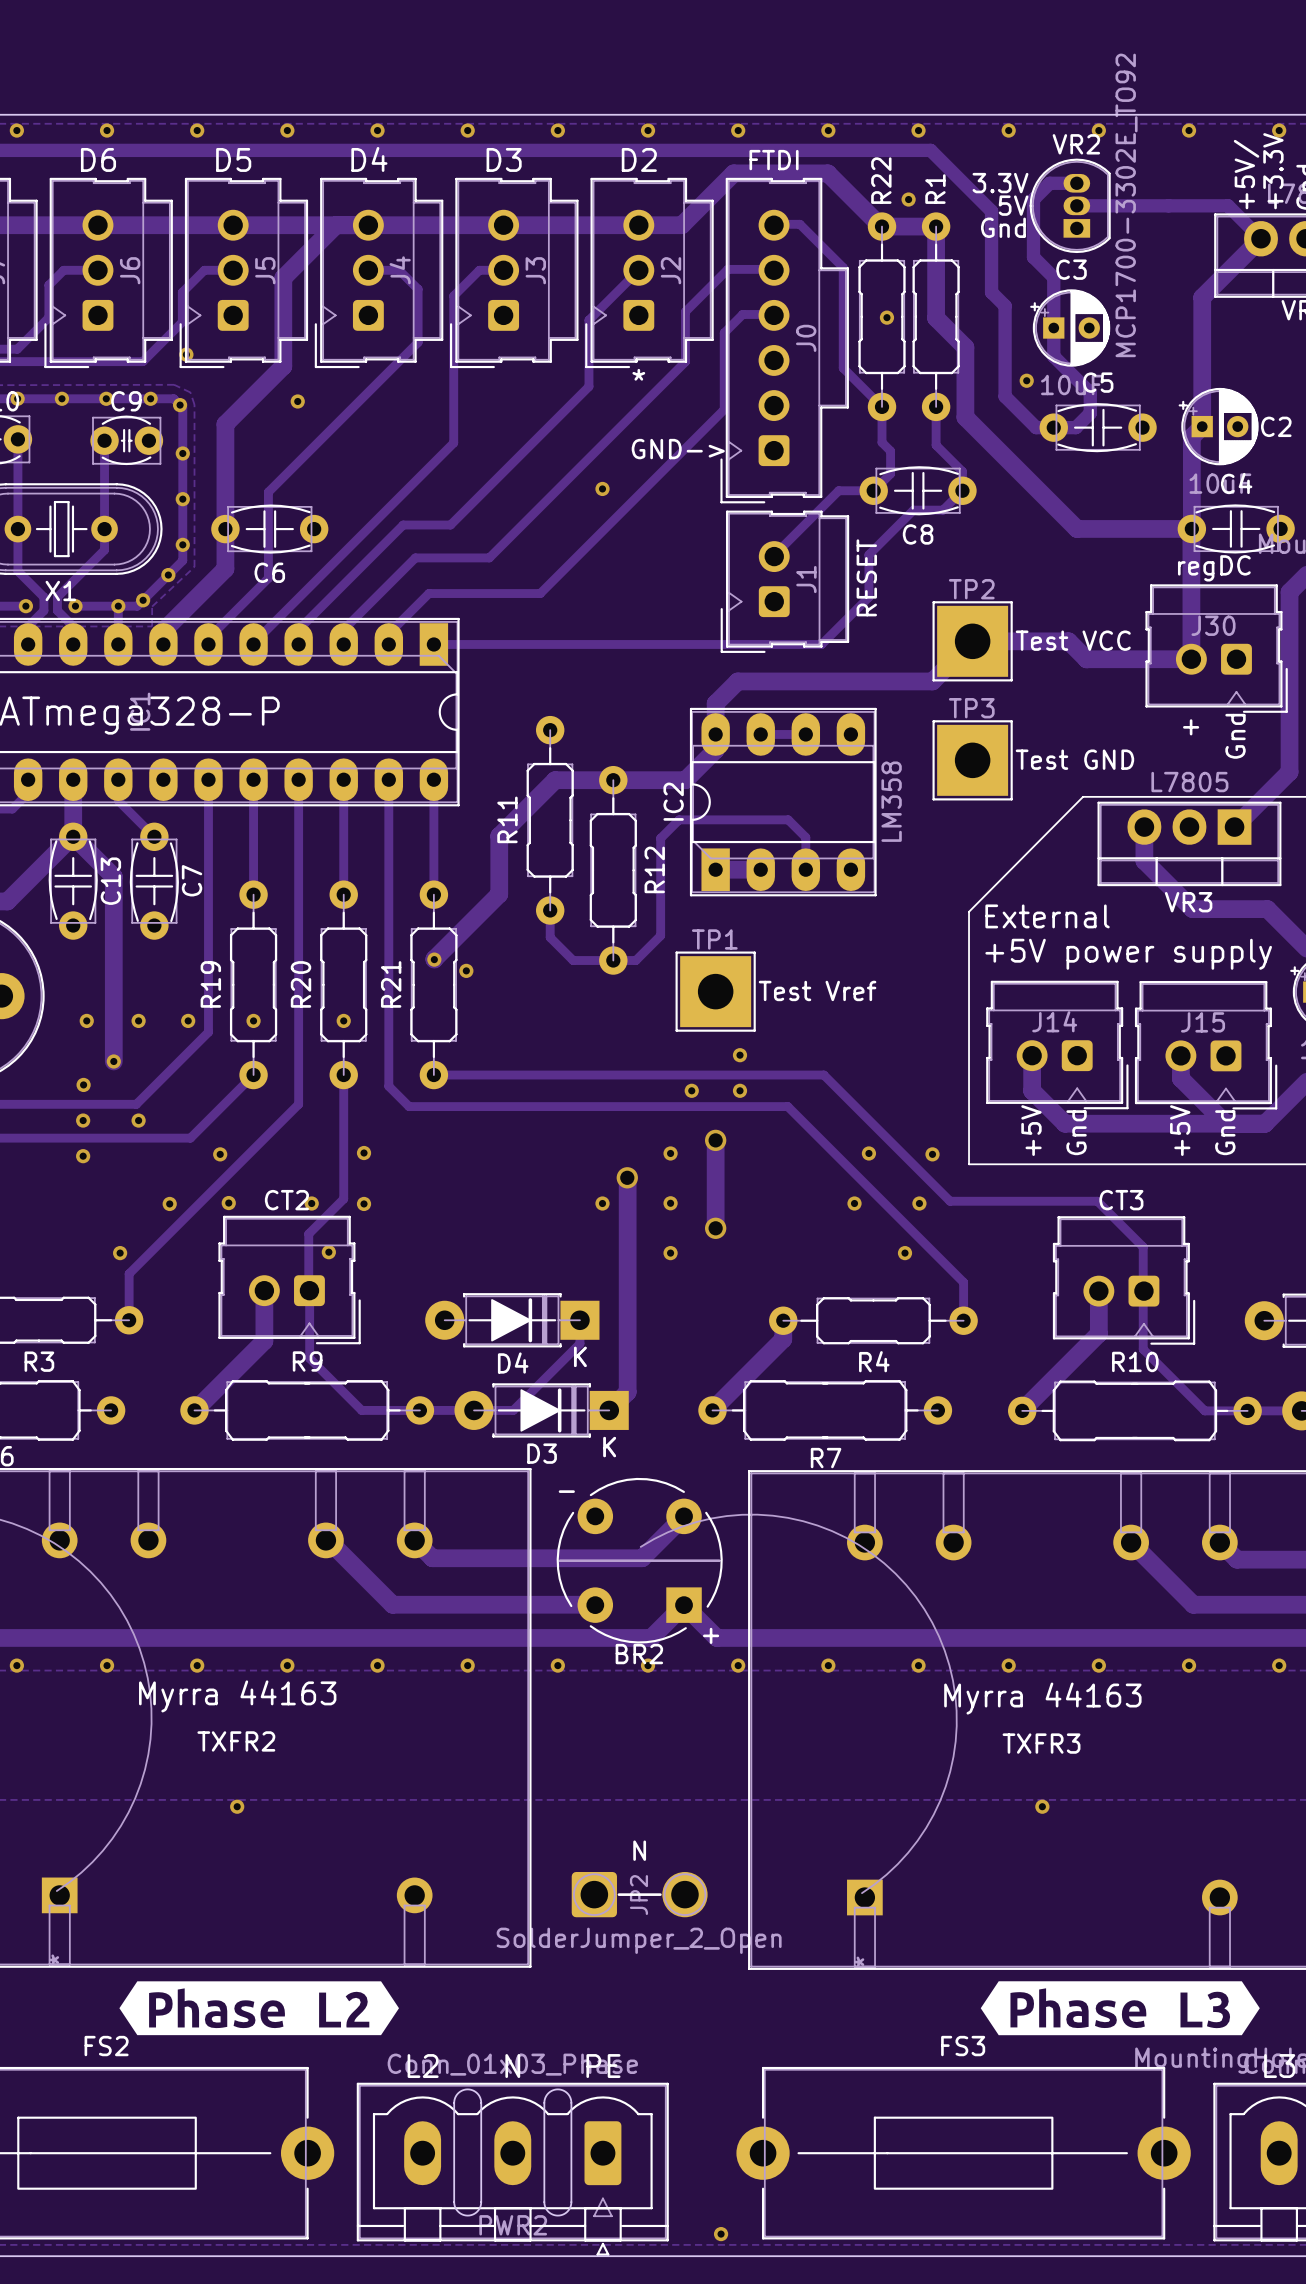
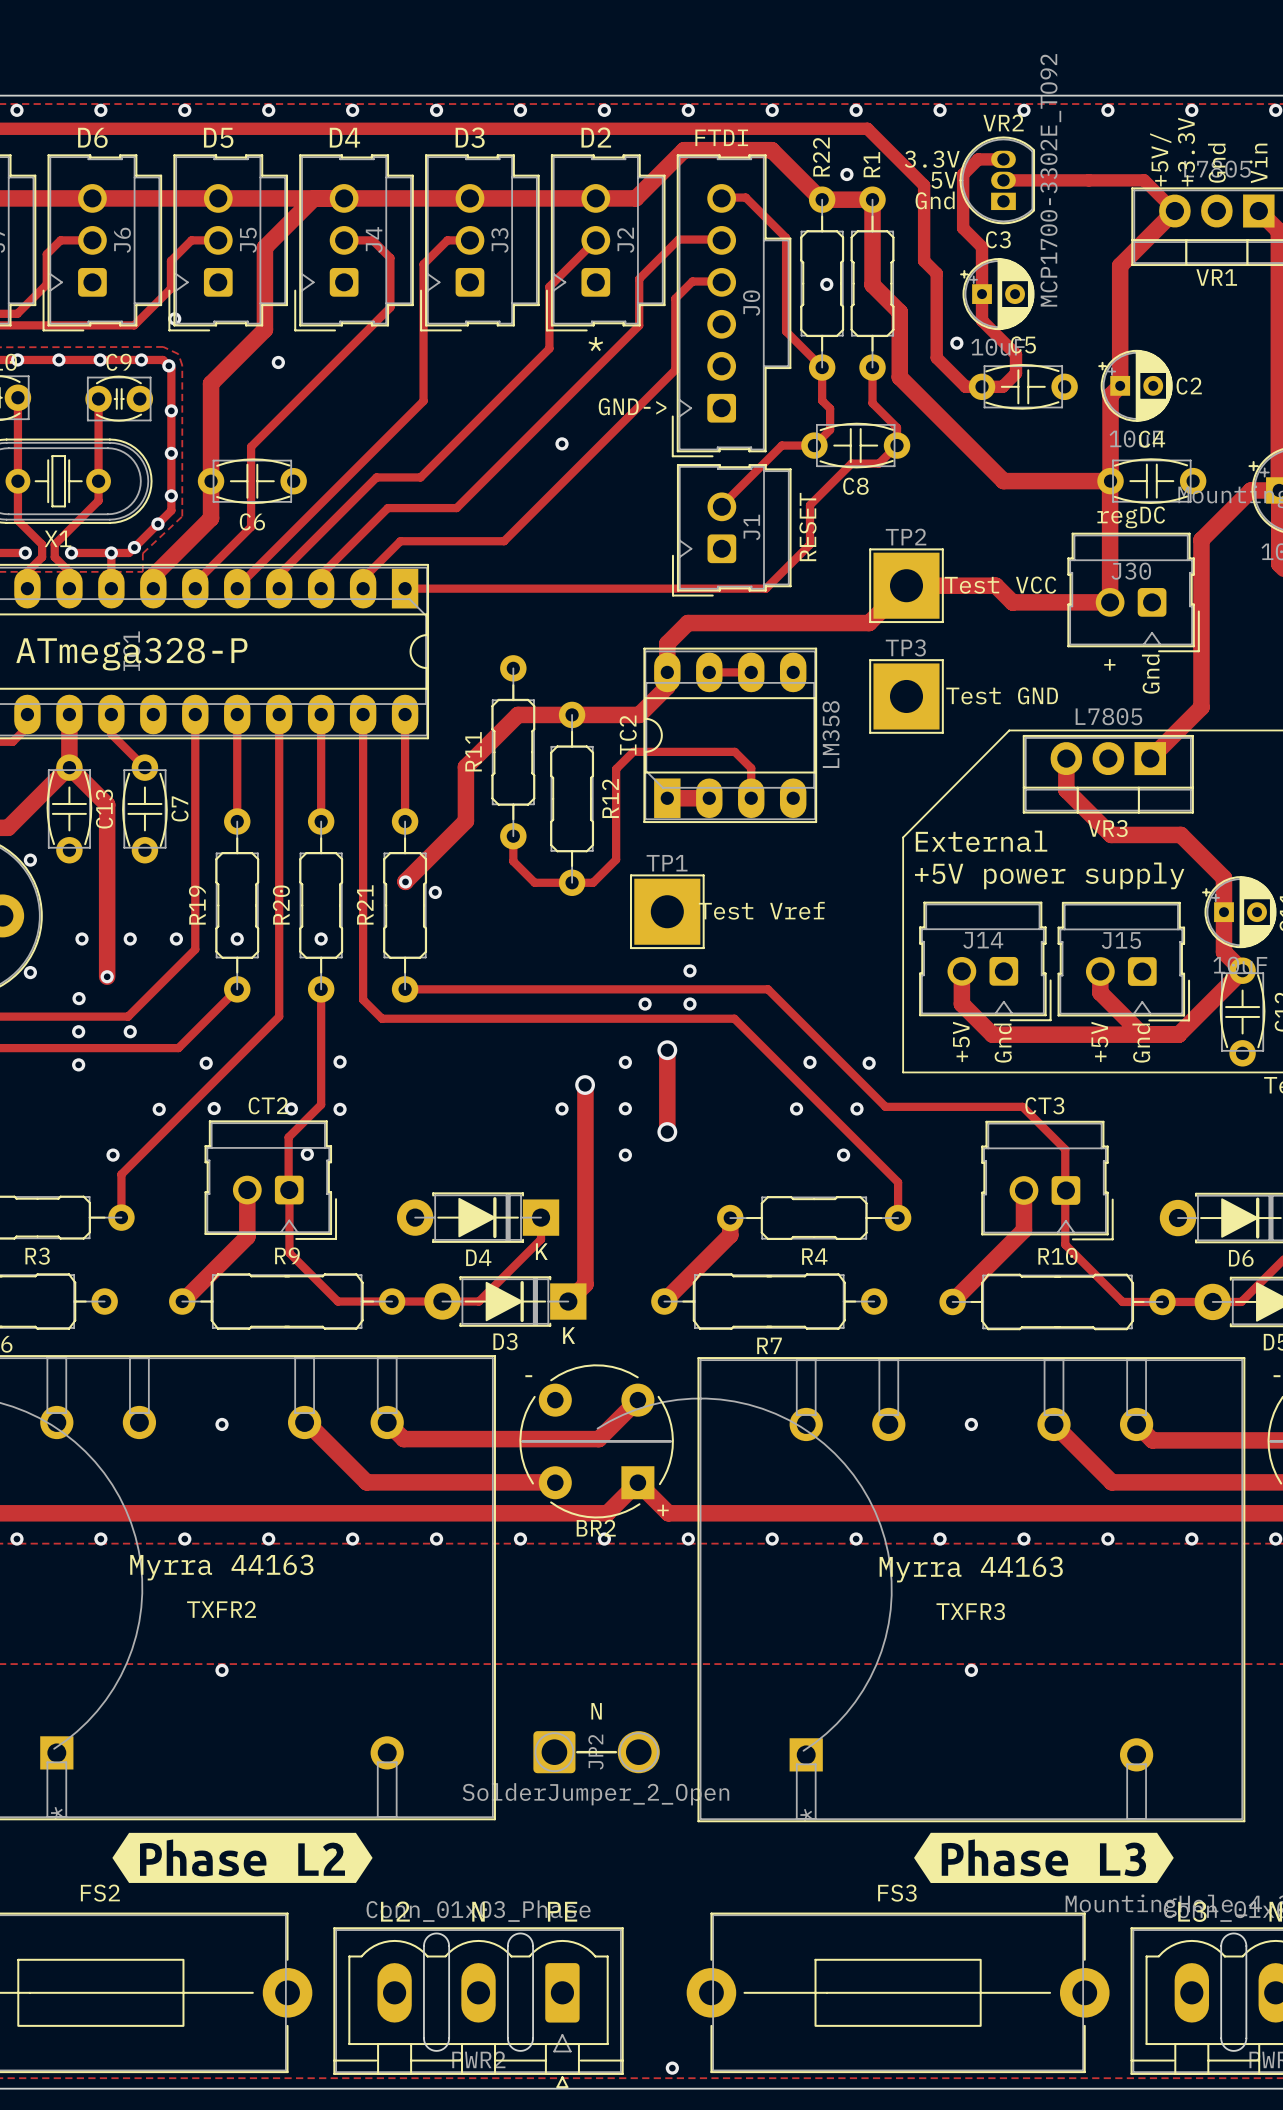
via: none -> (30, 860)
via: none -> (30, 972)
via: none -> (222, 1424)
via: none -> (971, 1424)

